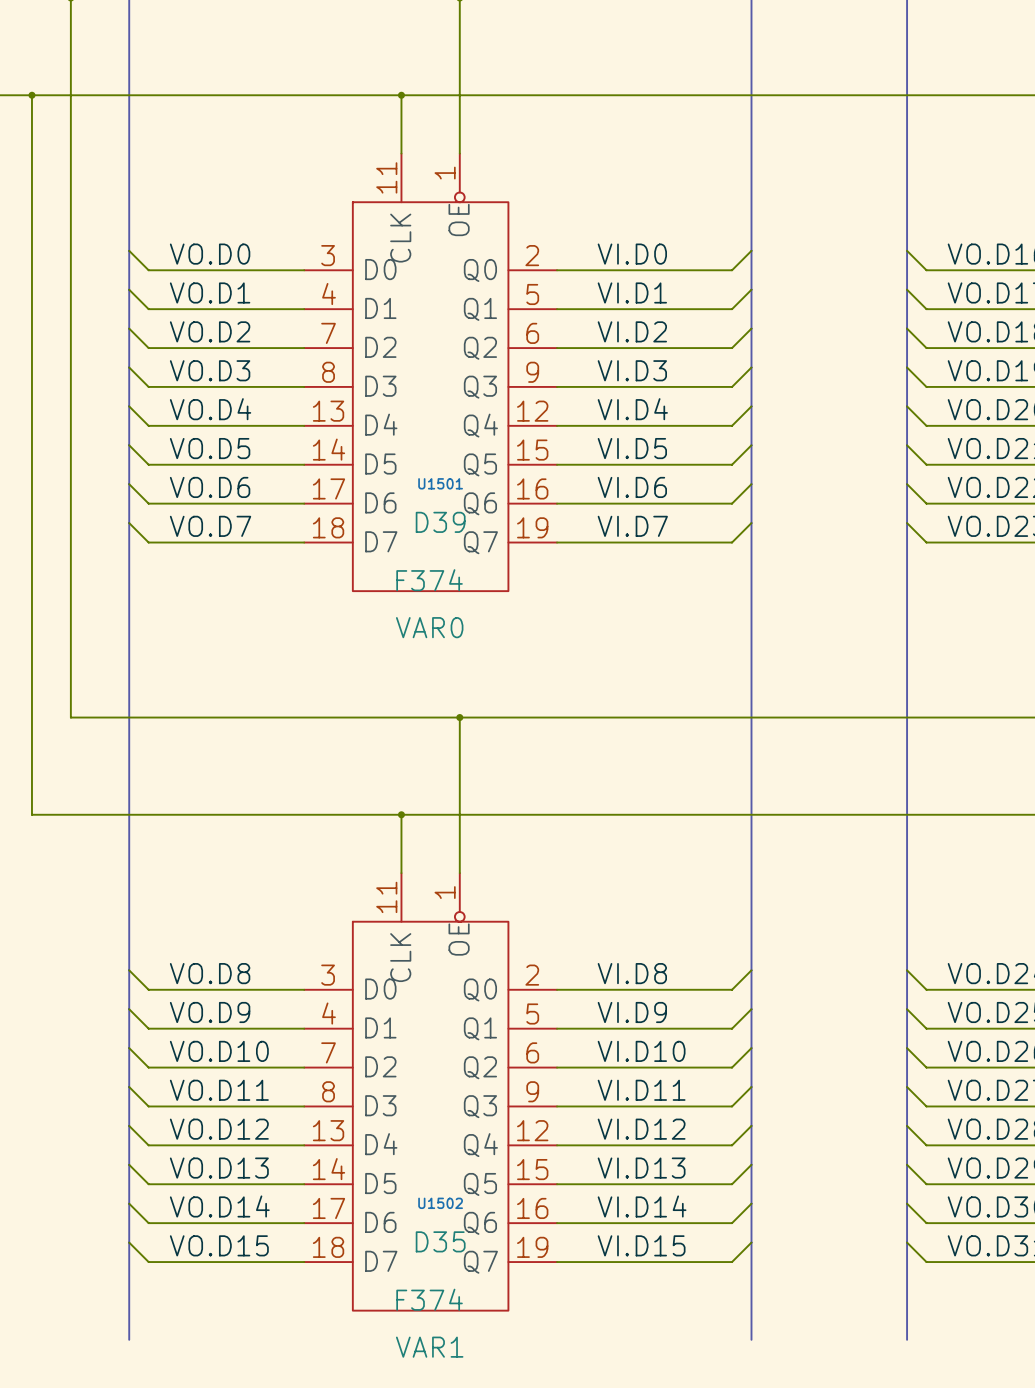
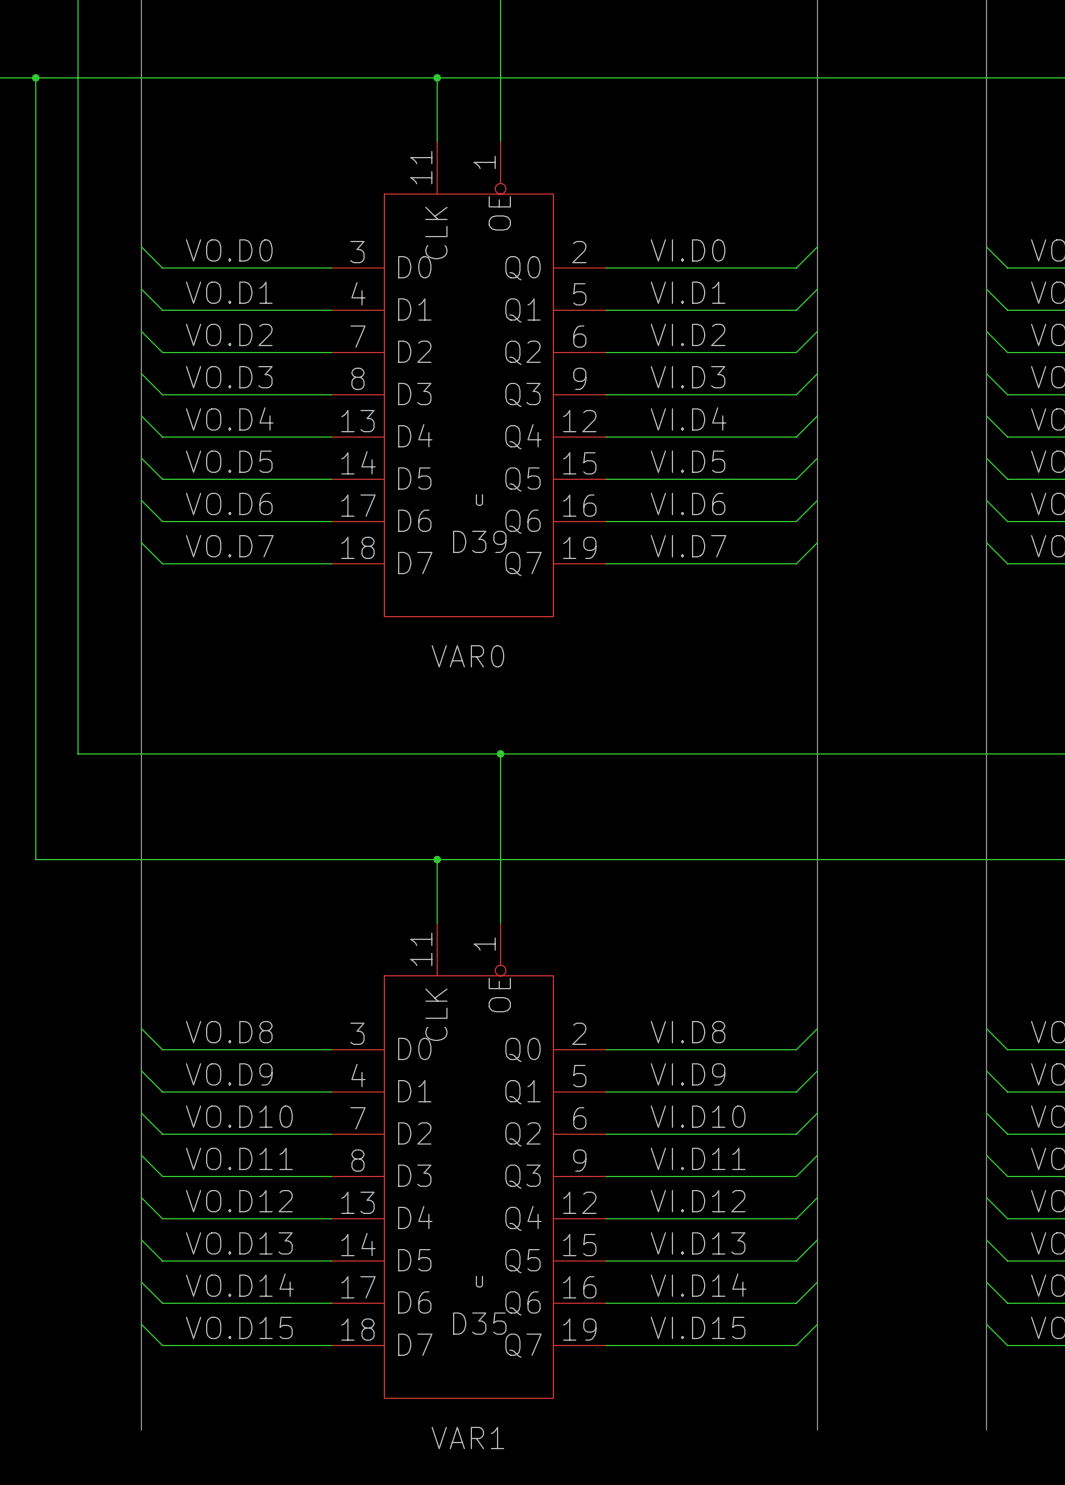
U1501 name: U1501 (440, 483) -> U (479, 500)
U1501 value: F374 (429, 580) -> none
U1502 name: U1502 (440, 1203) -> U (479, 1281)
U1502 value: F374 (429, 1299) -> none

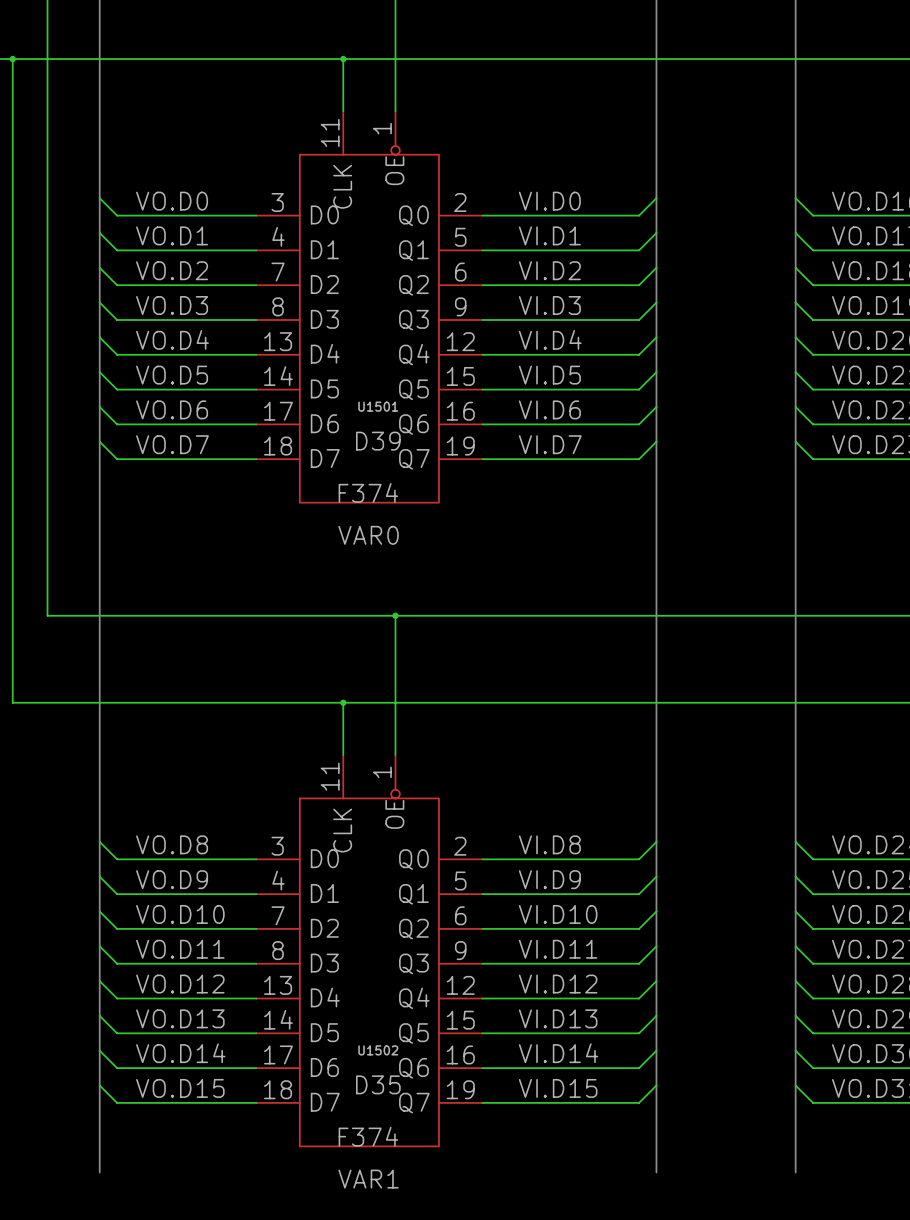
U name: U (479, 500) -> U1501 (378, 406)
U value: none -> F374 (368, 492)
U name: U (479, 1281) -> U1502 (378, 1050)
U value: none -> F374 (368, 1136)

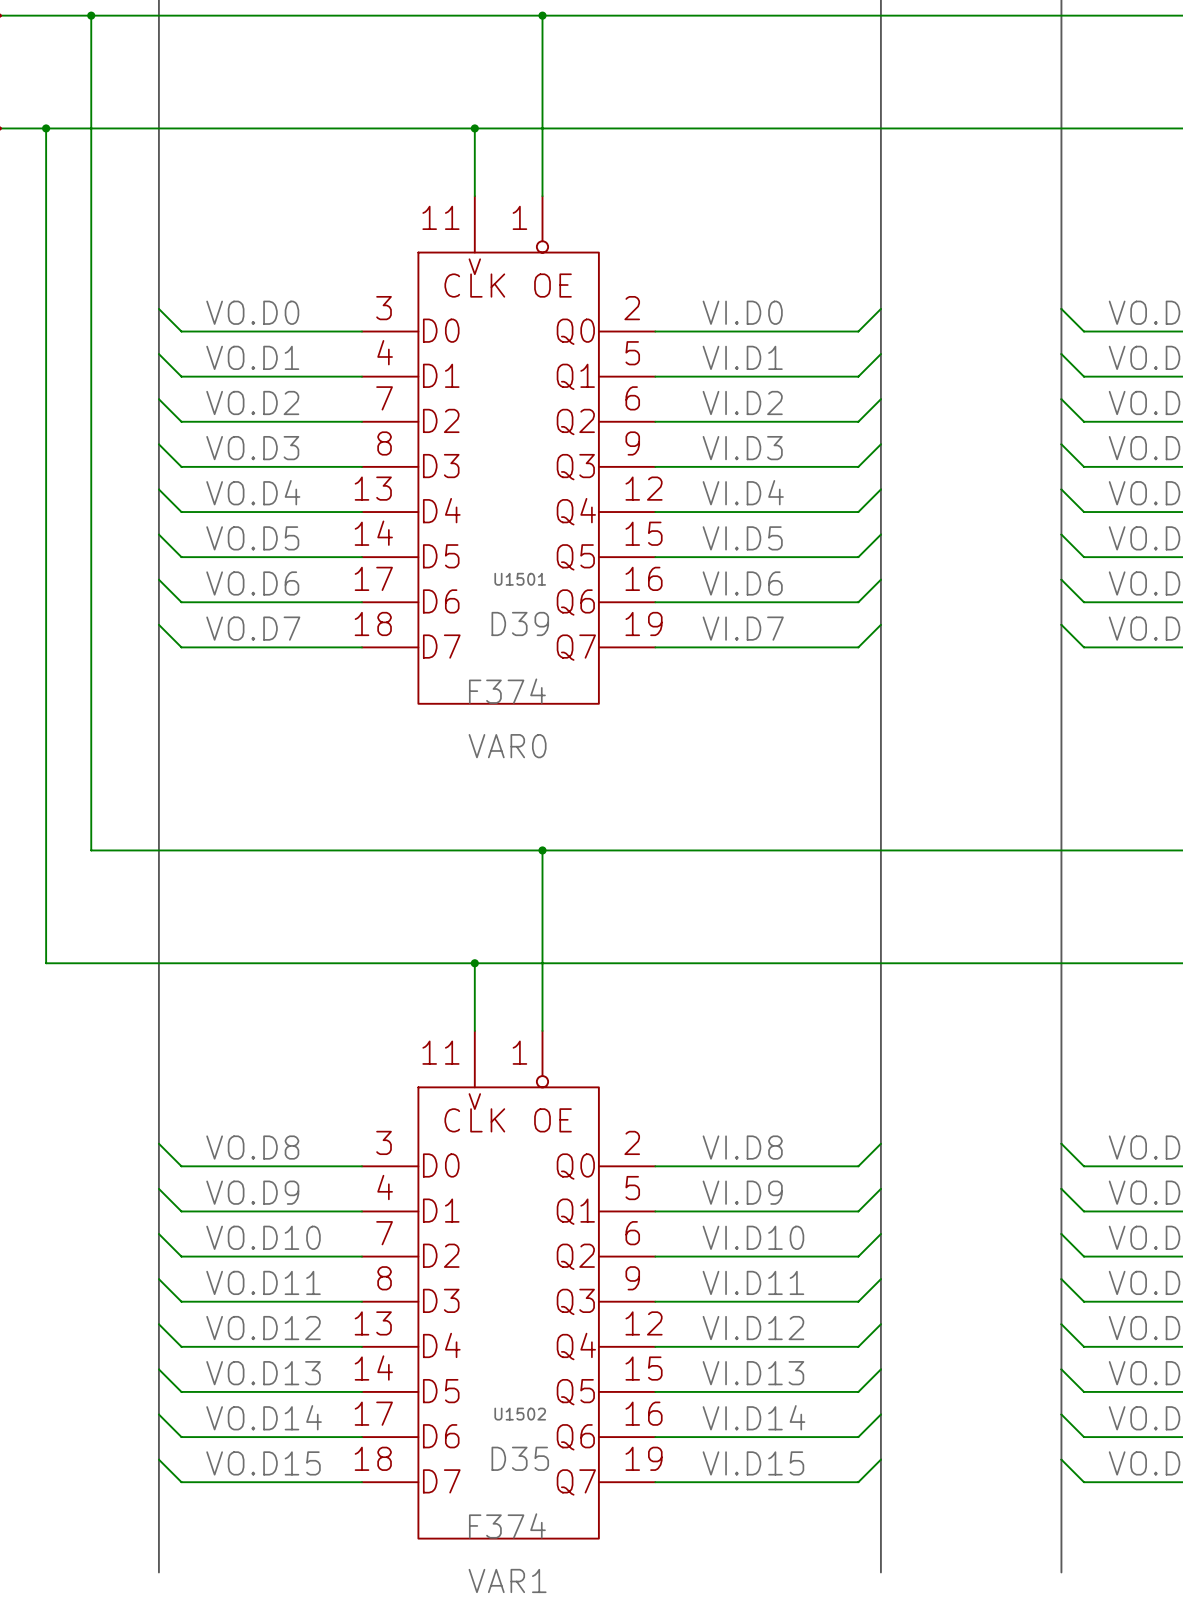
U1501 symbol: [256, 111, 483, 503] -> [362, 196, 656, 704]
U1502 symbol: [256, 754, 483, 1147] -> [362, 1030, 656, 1539]

